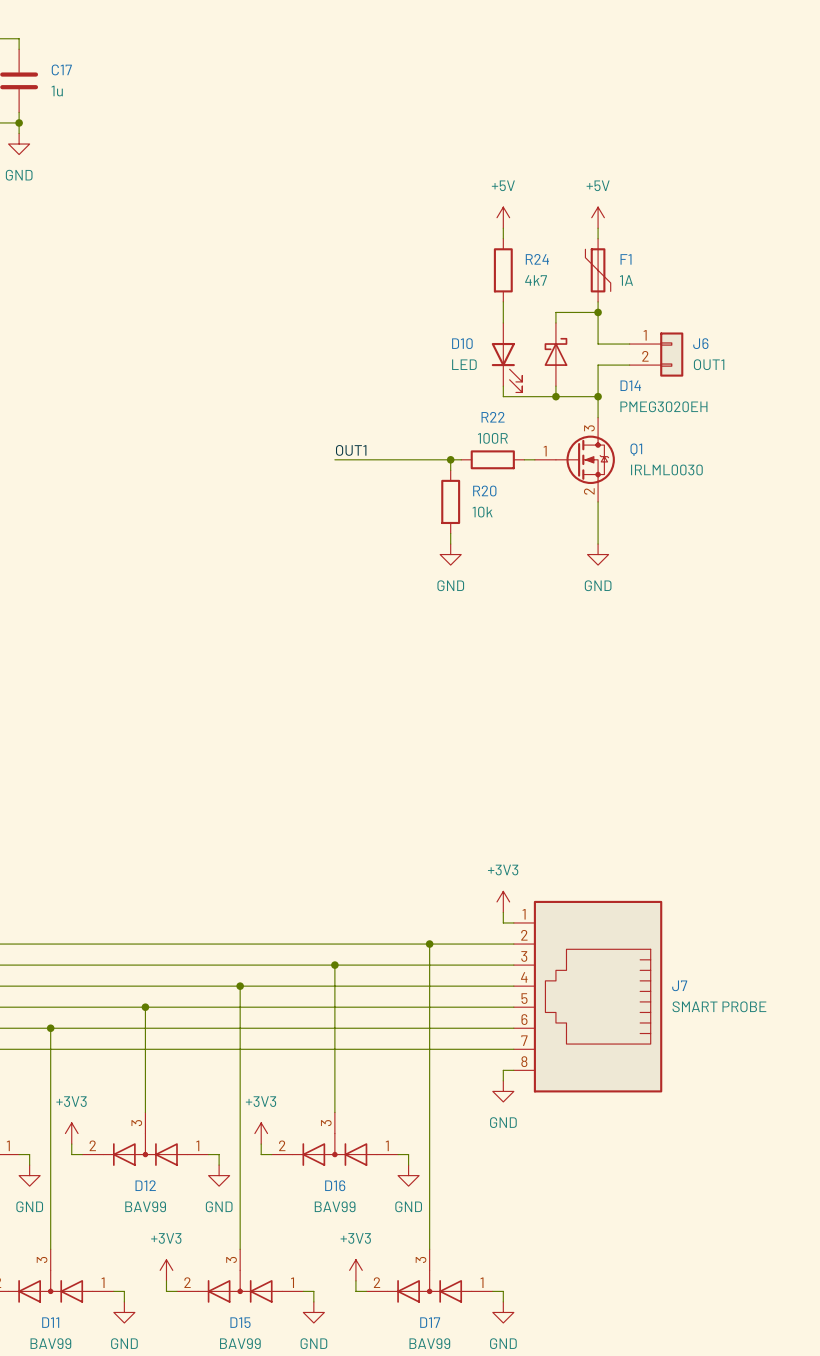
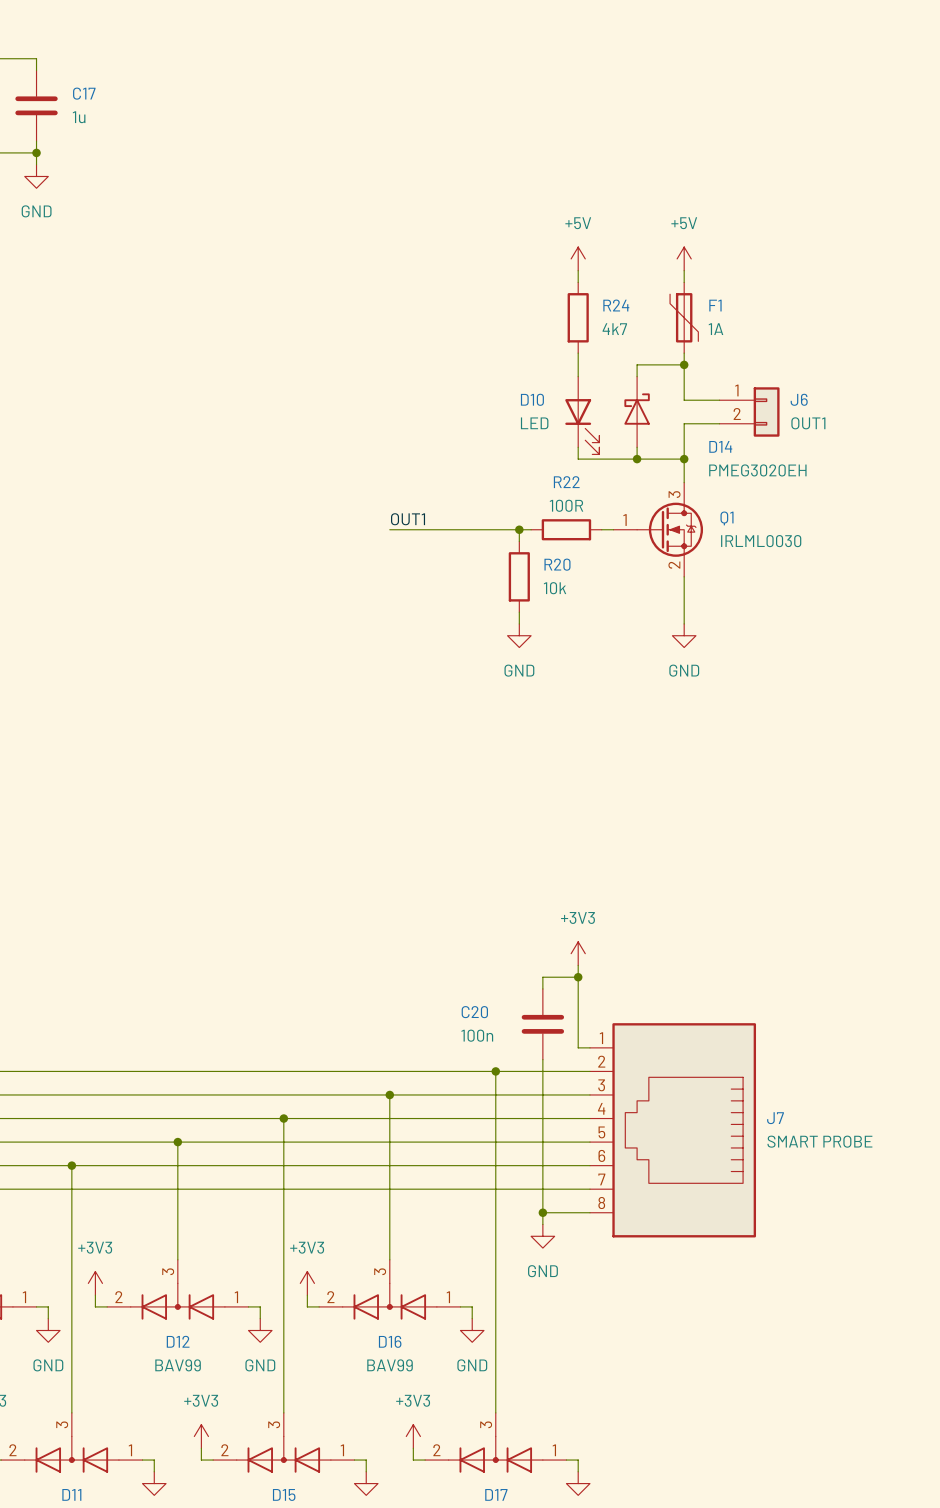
wire: none -> (578, 965) (578, 1036)
wire: none -> (578, 977) (542, 977) (542, 989)
junction: none -> (578, 977)
C20: none -> 100n (542, 1024)
power symbol position: +3V3 (503, 901) -> +3V3 (578, 953)
wire: none -> (542, 1059) (542, 1224)
junction: none -> (542, 1212)
wire: (503, 1070) (503, 1080) -> (578, 1212) (542, 1212)
power symbol position: GND (503, 1091) -> GND (542, 1236)

